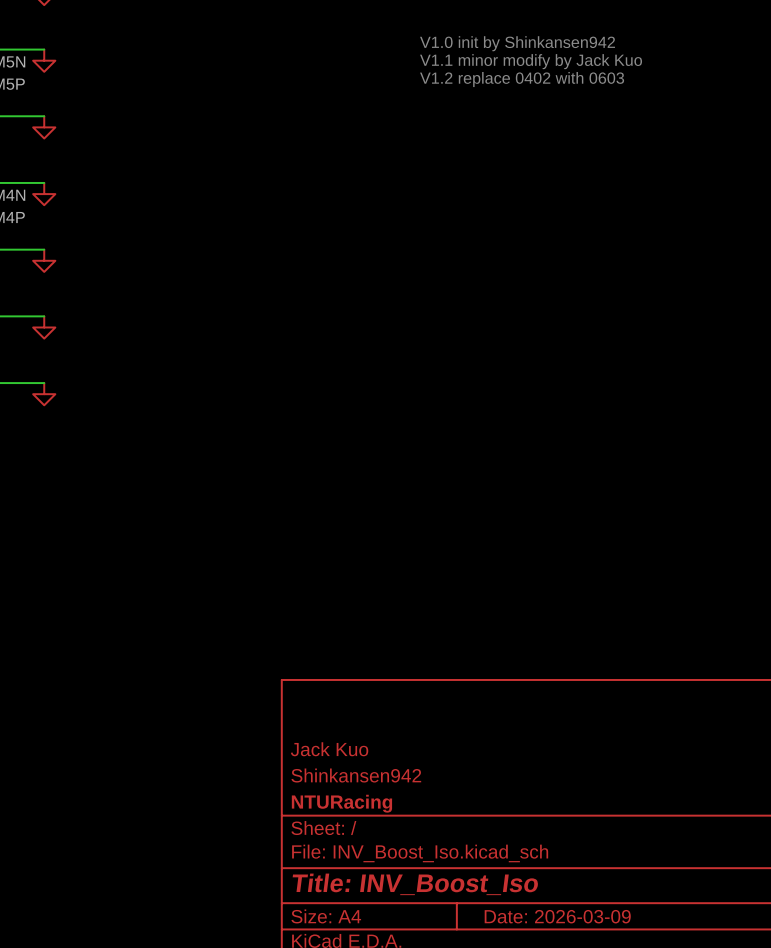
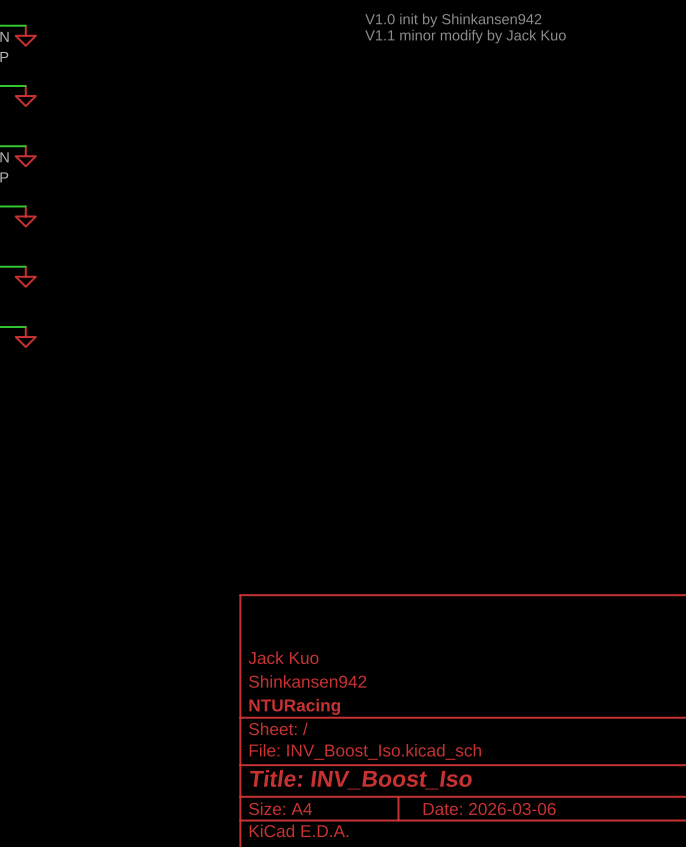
text: V1.2 replace 0402 with 0603 (522, 79) -> none
title block: Date: 2026-03-09 (557, 916) -> Date: 2026-03-06 (489, 809)

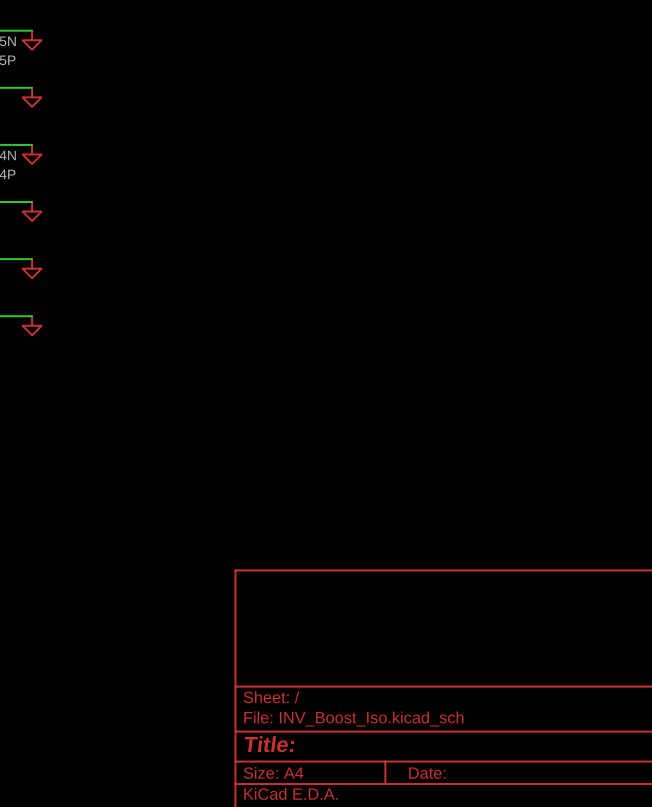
text: V1.0 init by Shinkansen942 (453, 20) -> none
text: V1.1 minor modify by Jack Kuo (465, 36) -> none
title block: Jack Kuo (283, 657) -> none
title block: Shinkansen942 (307, 681) -> none
title block: NTURacing (294, 706) -> none
title block: Title: INV_Boost_Iso (361, 779) -> Title: (269, 744)
title block: Date: 2026-03-06 (489, 809) -> Date: (427, 773)

